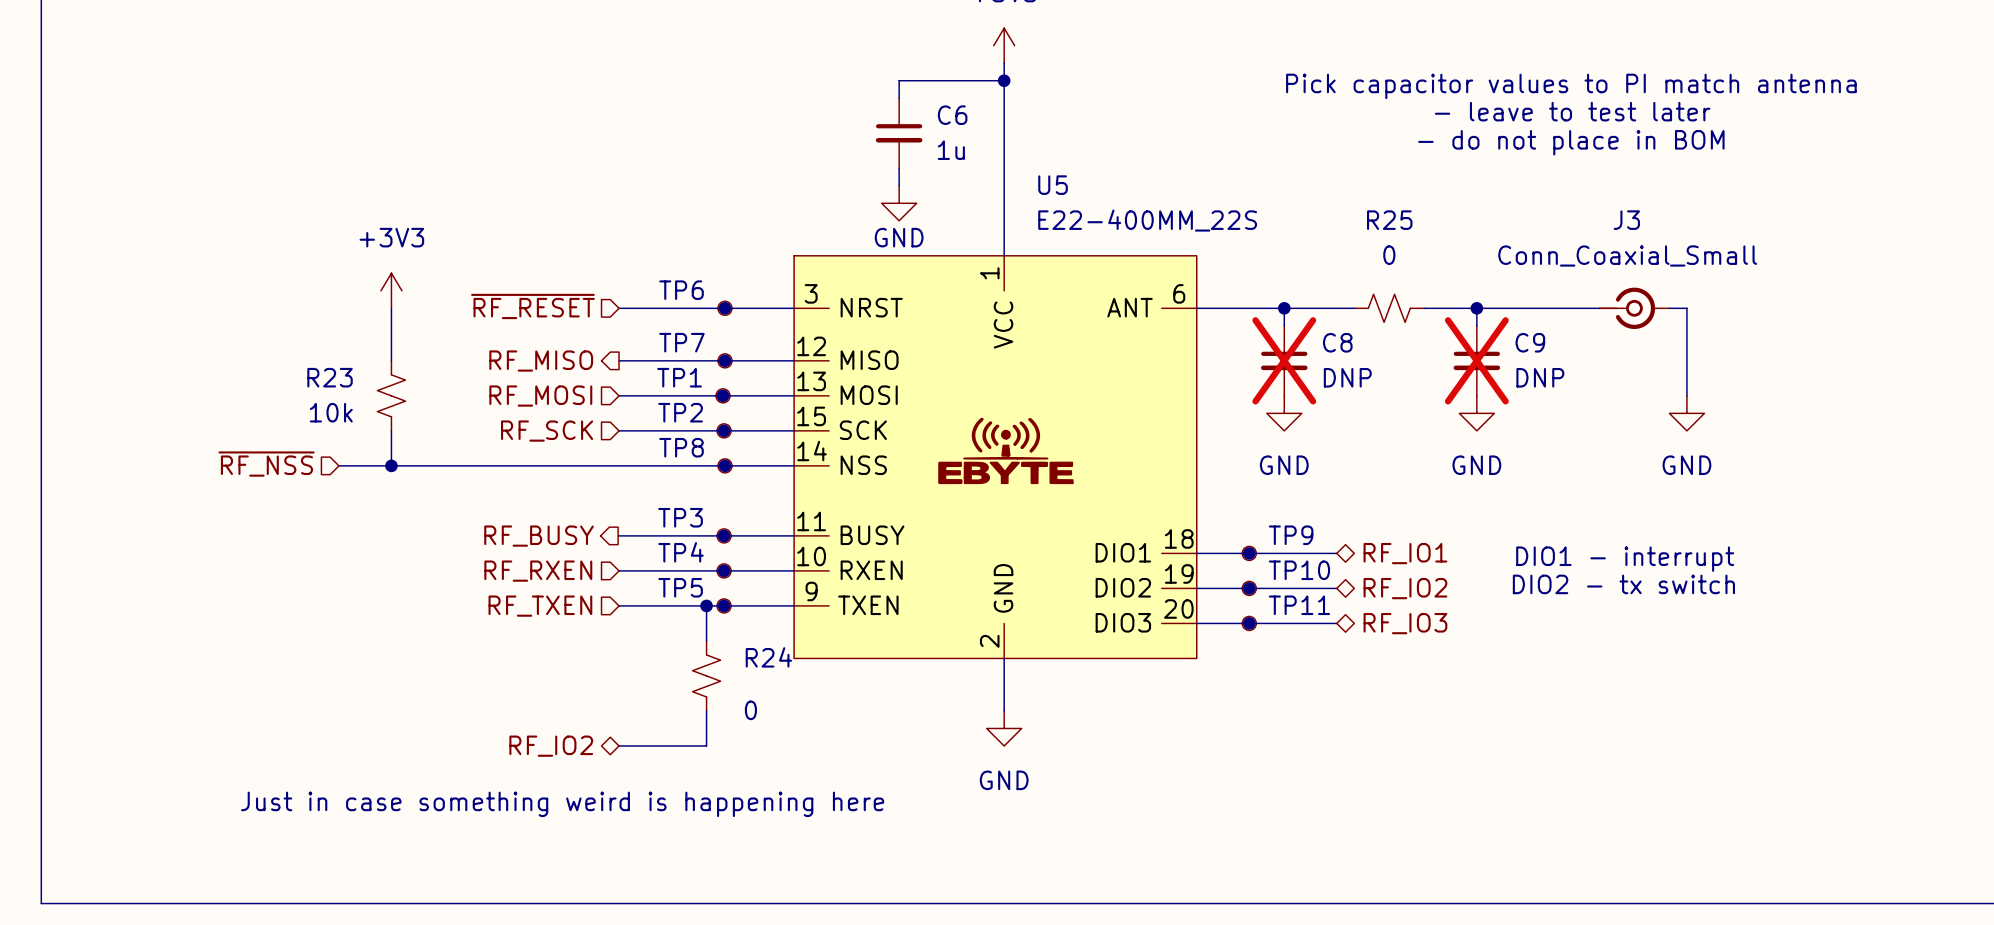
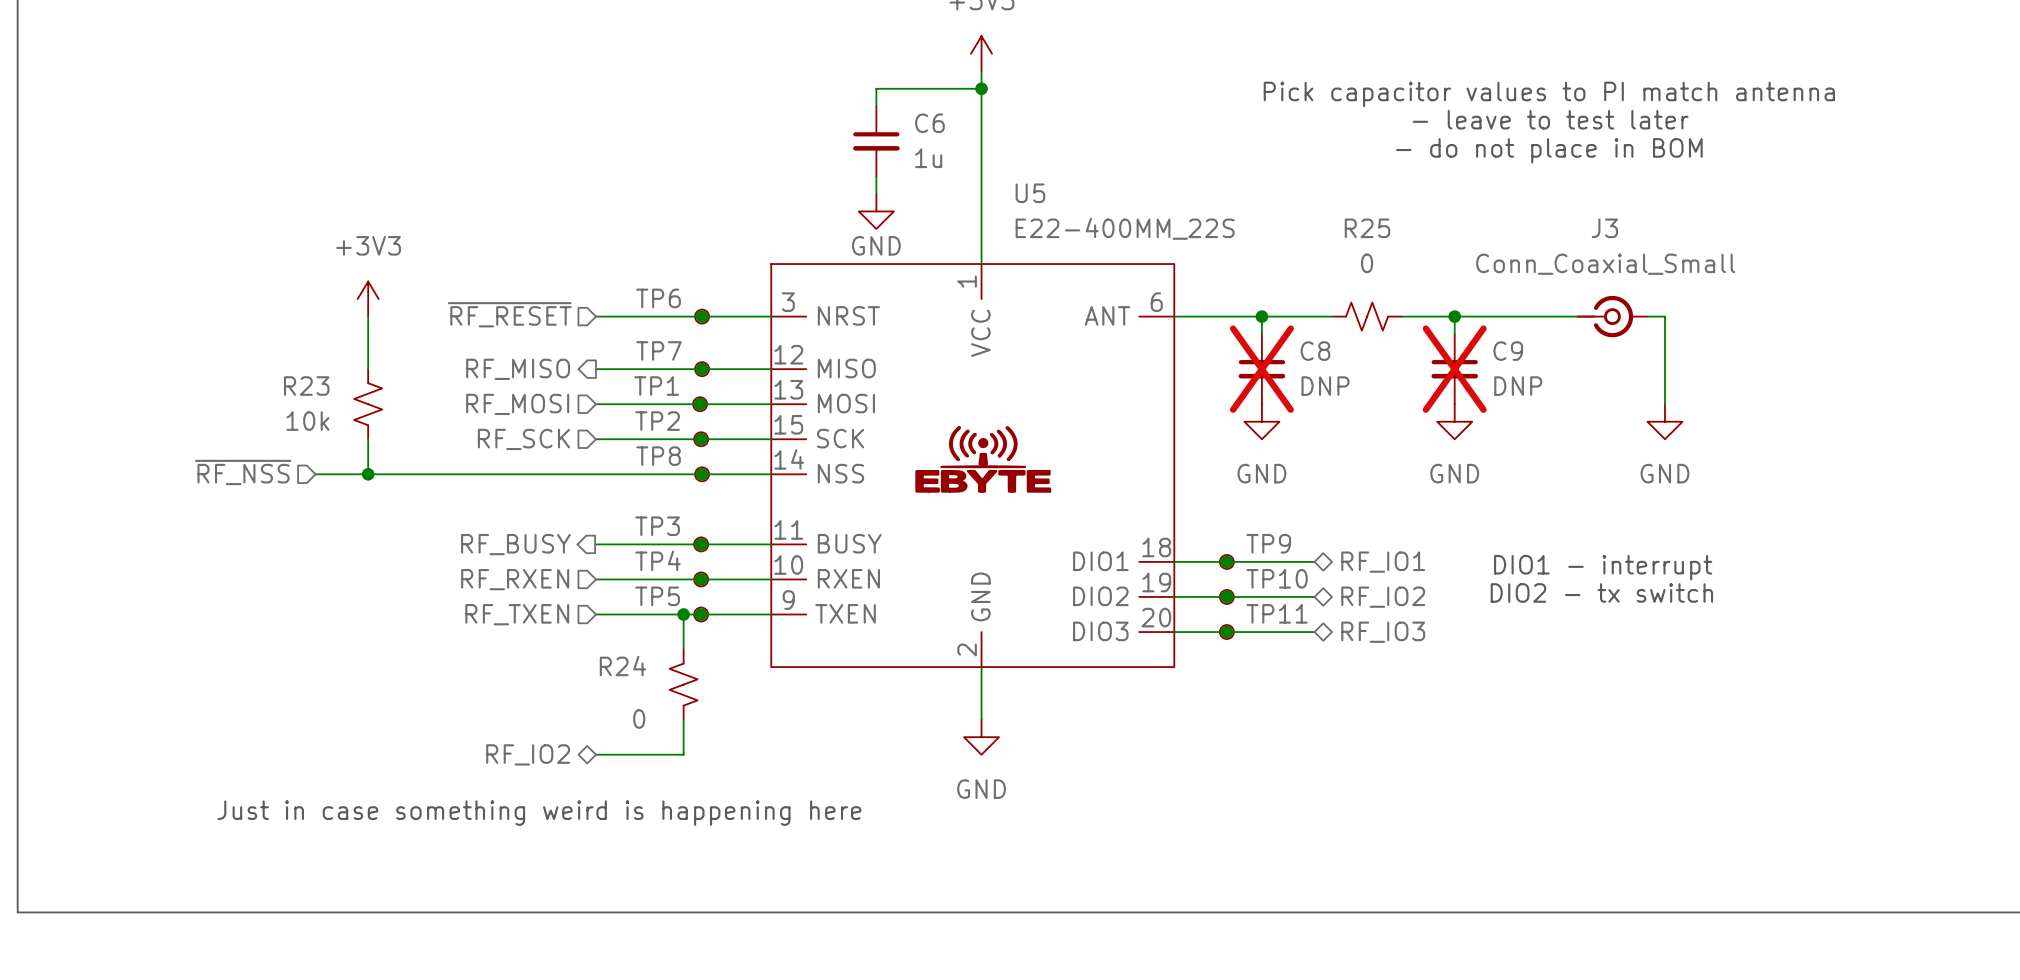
R24 flip: as is (706, 675) -> left-right (683, 684)

